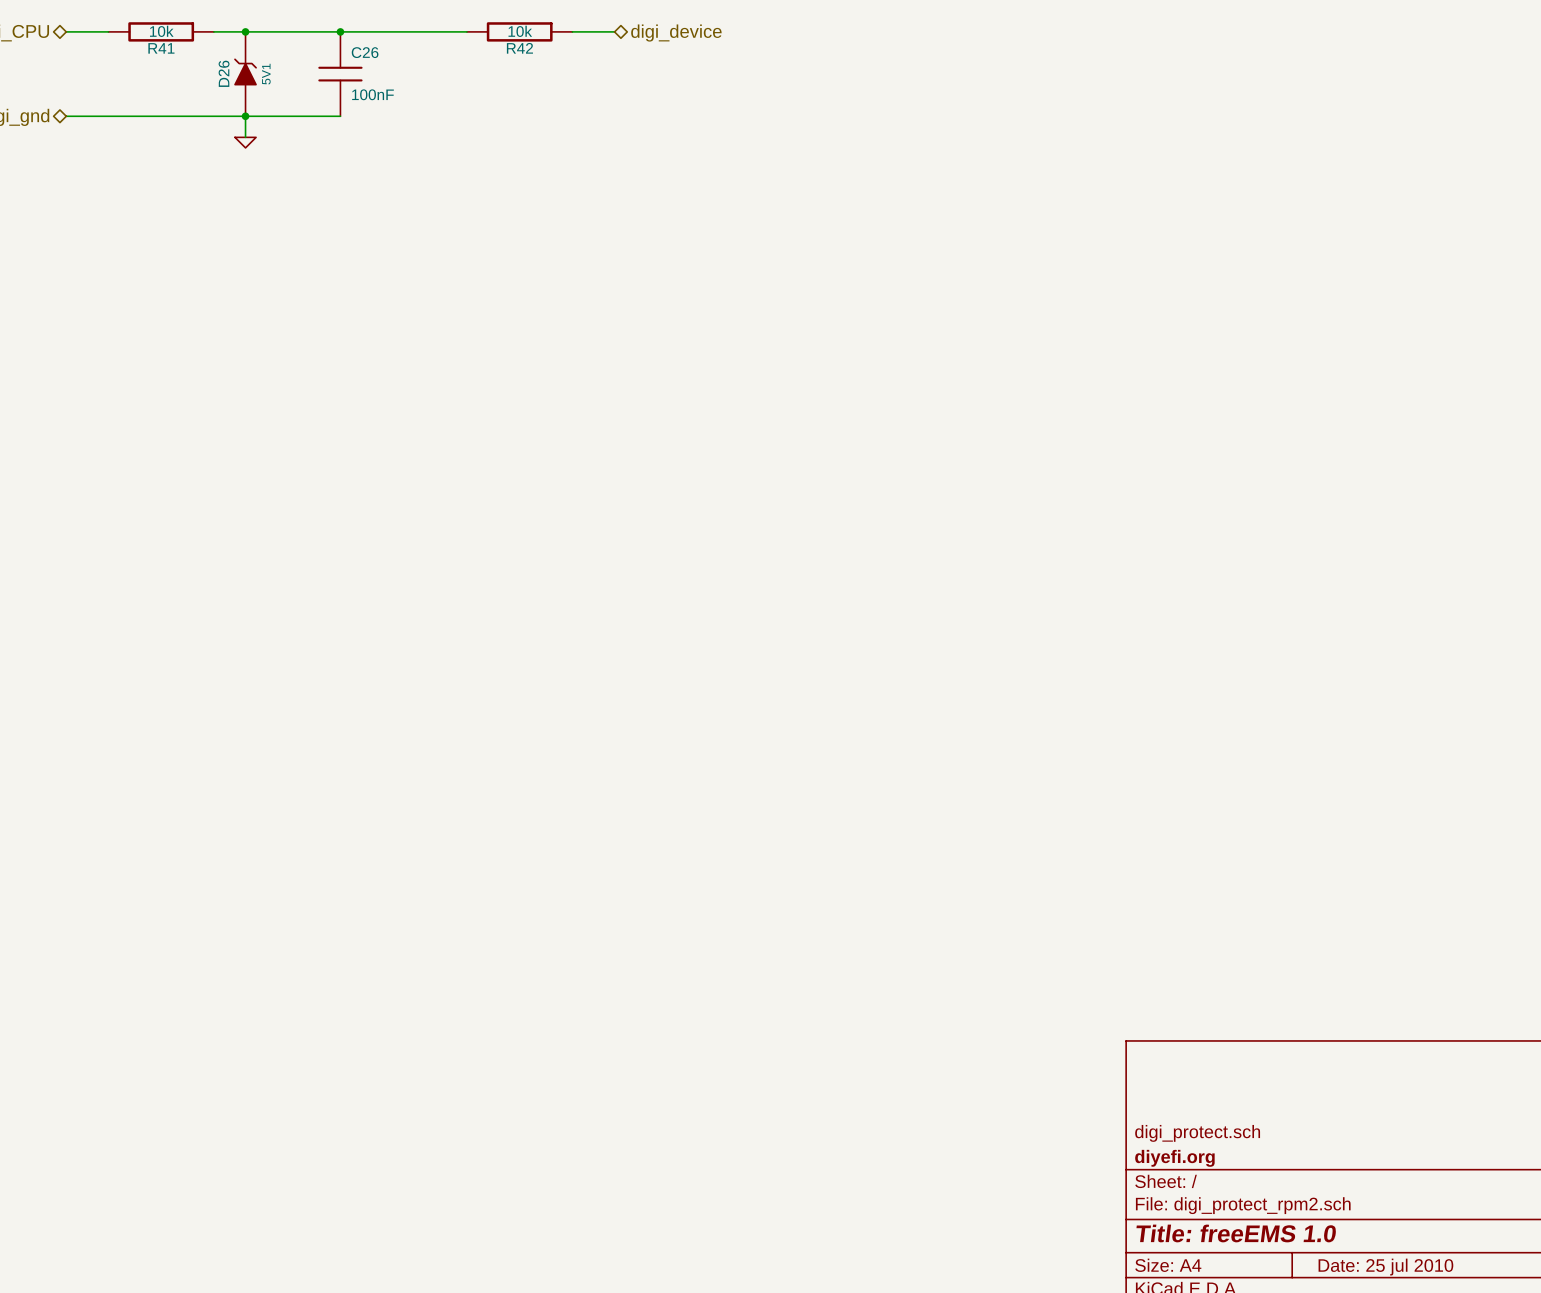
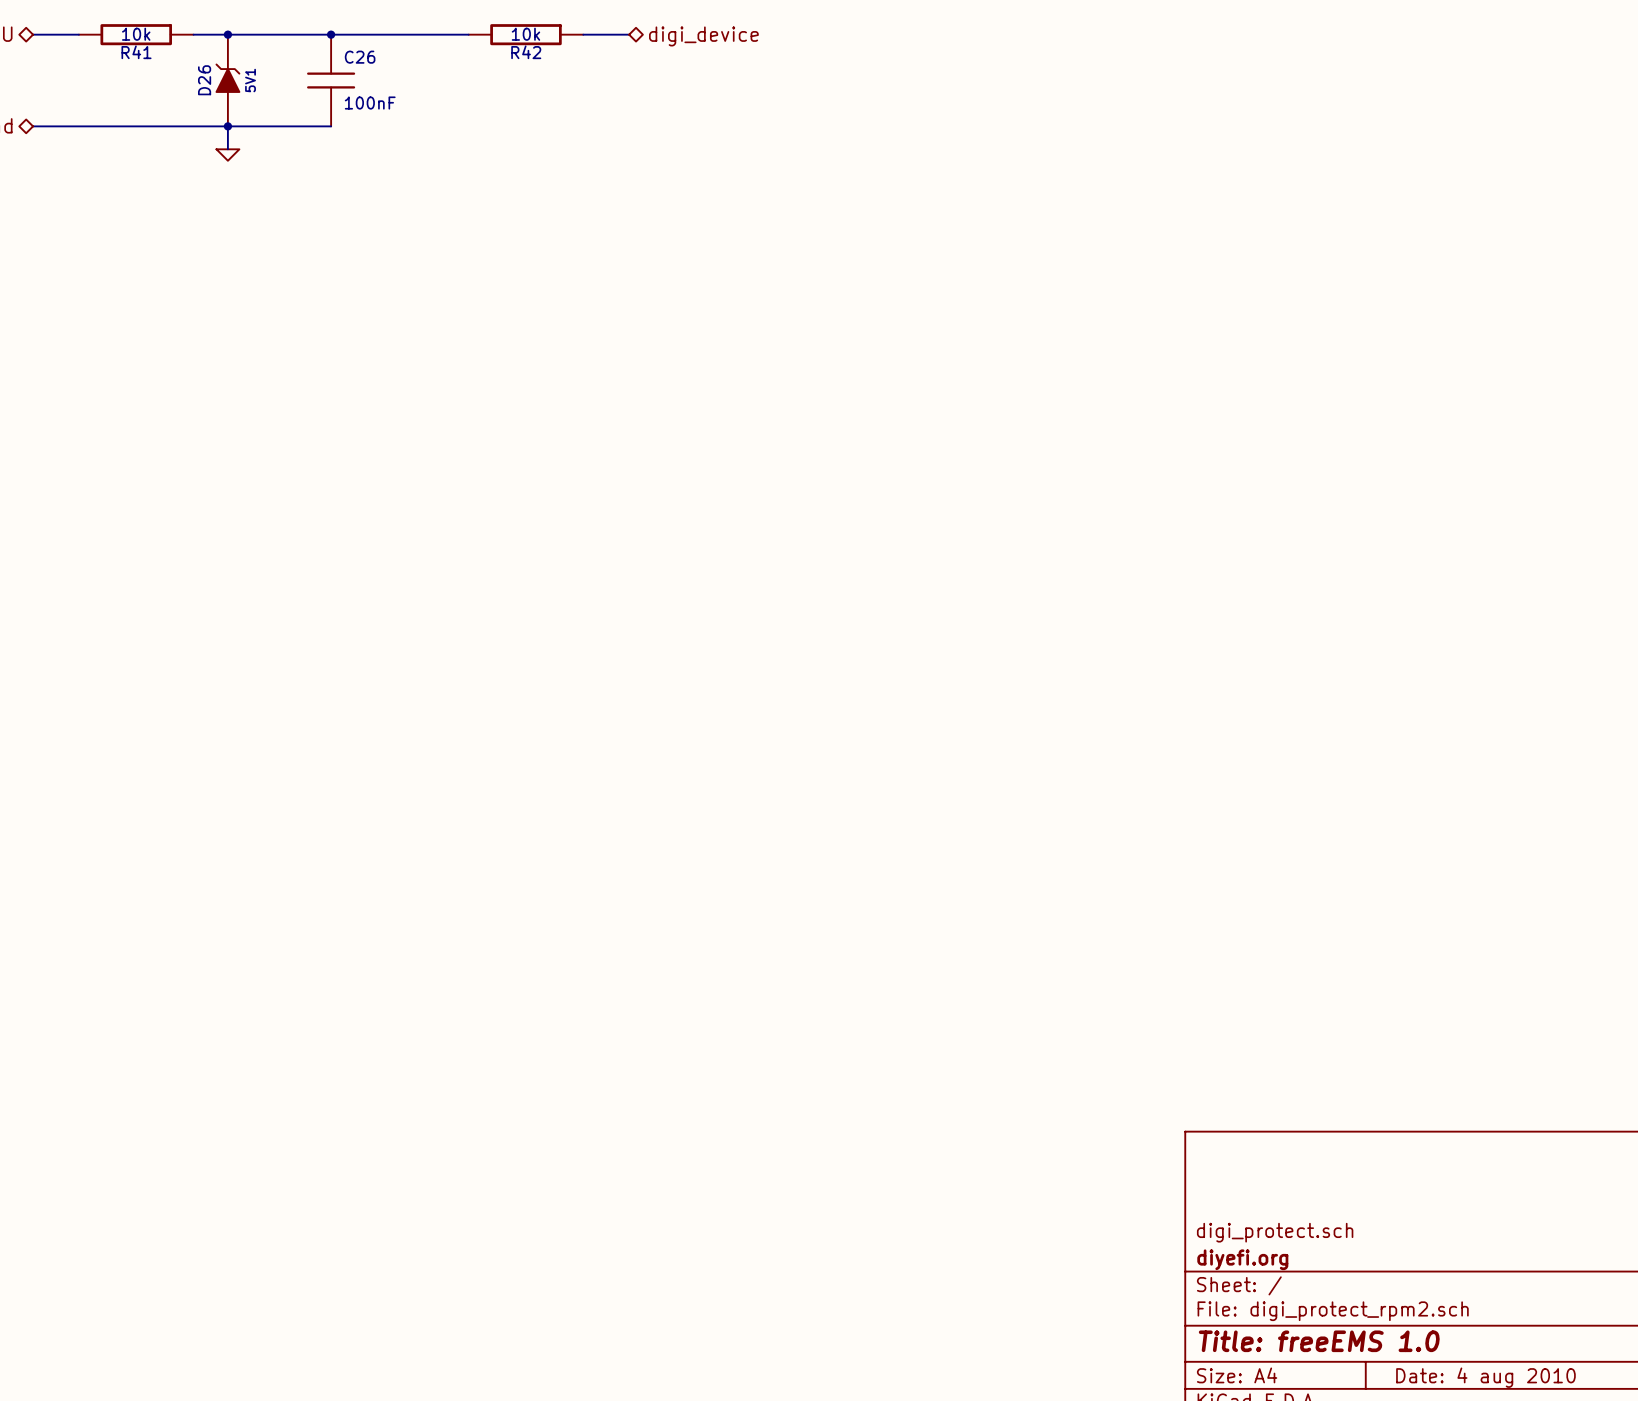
title block: Date: 25 jul 2010 (1385, 1267) -> Date: 4 aug 2010 (1485, 1377)

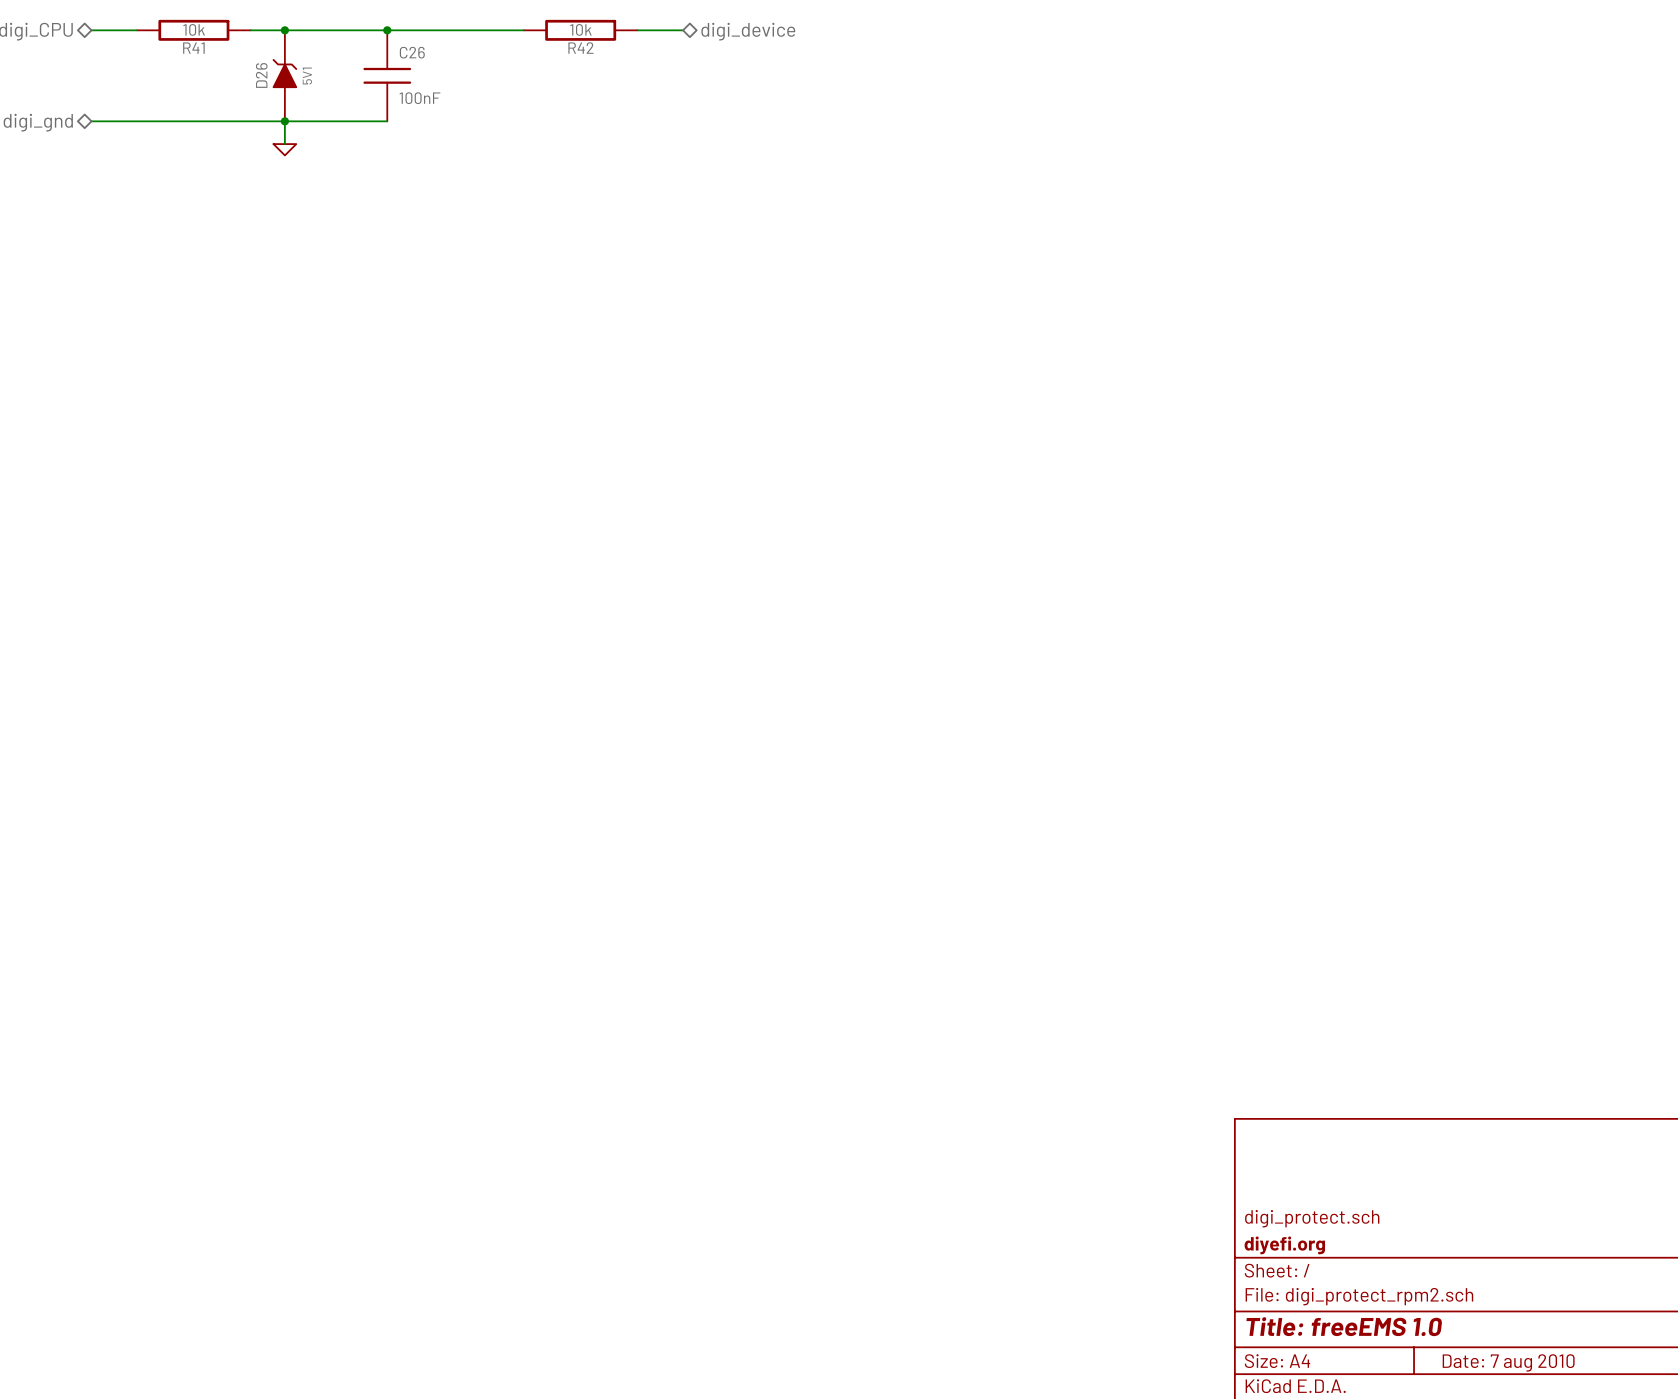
title block: Date: 4 aug 2010 (1485, 1377) -> Date: 7 aug 2010 (1508, 1362)

